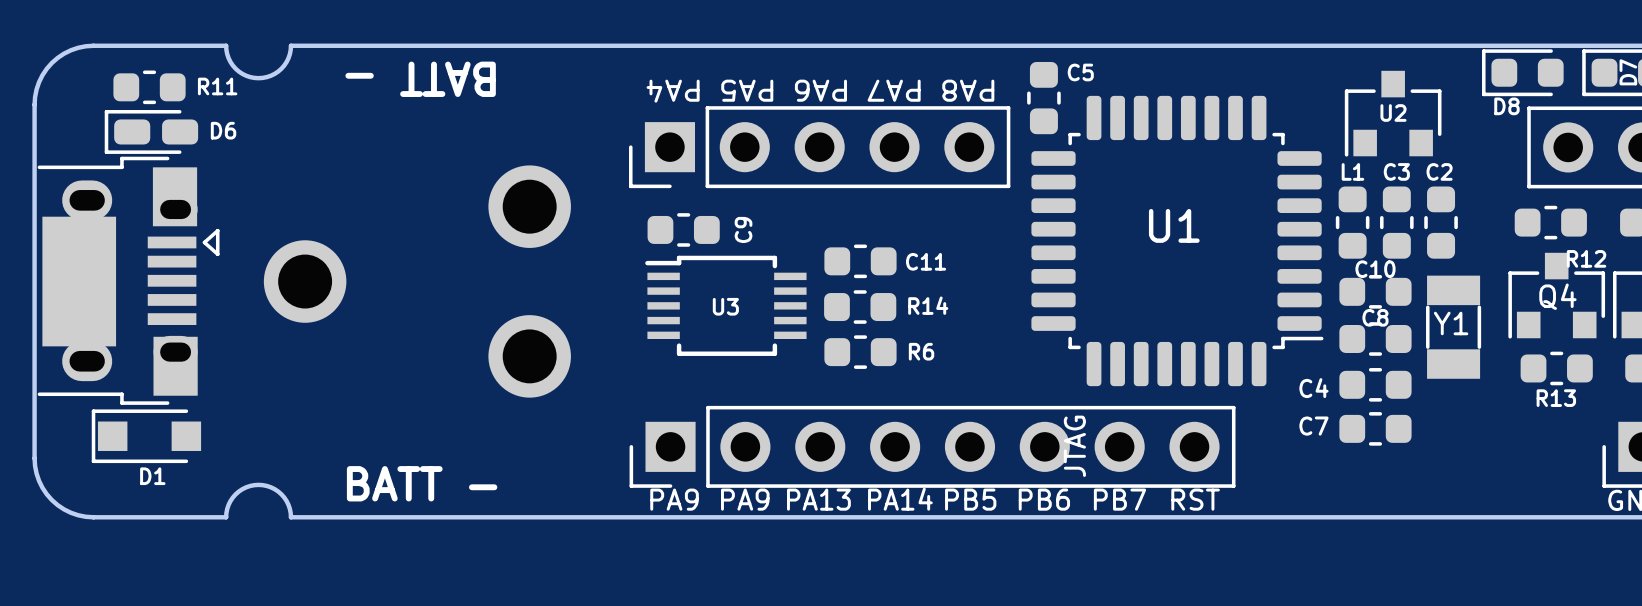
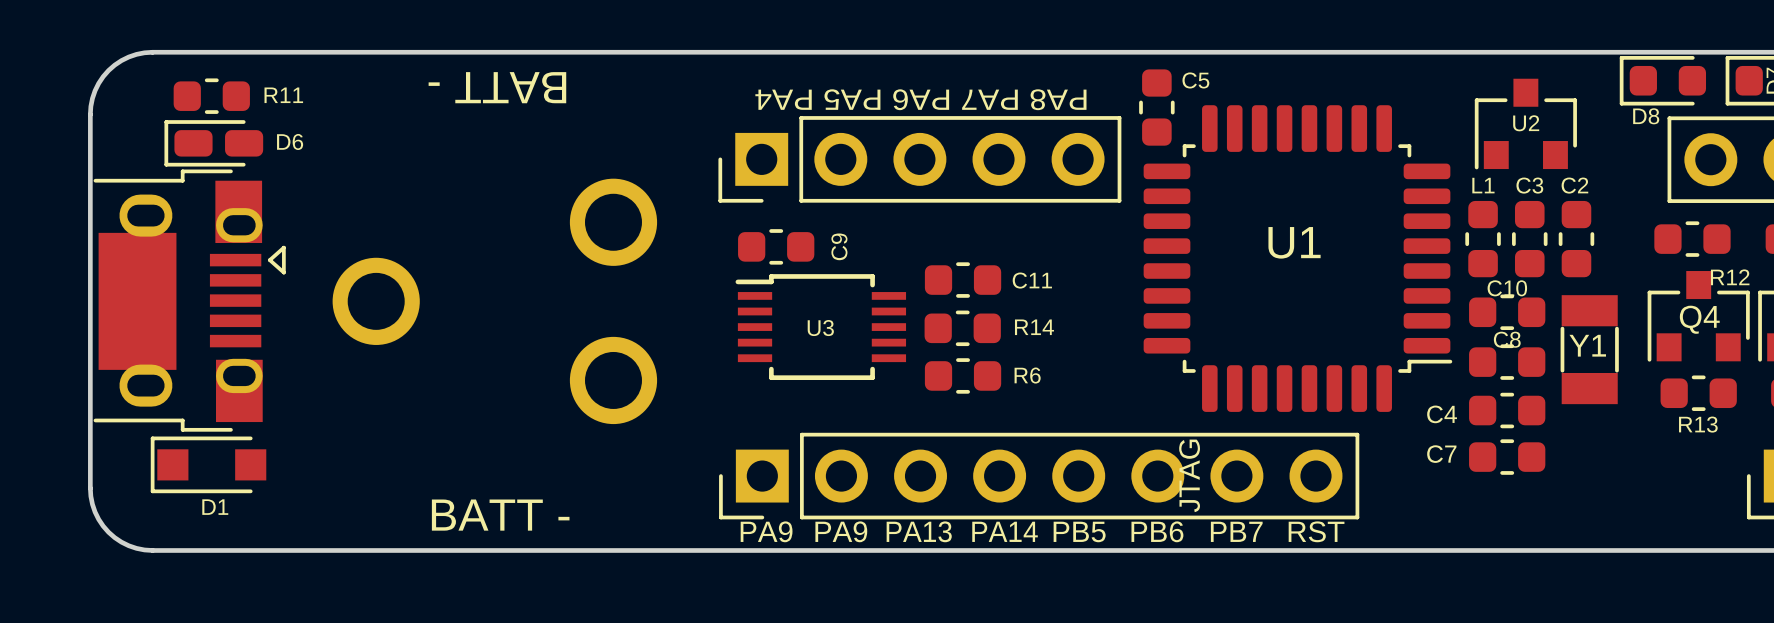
board edge: (226, 45) (228, 58) (235, 68) (246, 75) (258, 78) (270, 75) (281, 68) (288, 58) (290, 45) -> (292, 52) (361, 52)
board edge: (226, 517) (228, 504) (235, 494) (246, 487) (258, 484) (270, 487) (281, 494) (288, 504) (290, 517) -> (292, 550) (361, 550)

